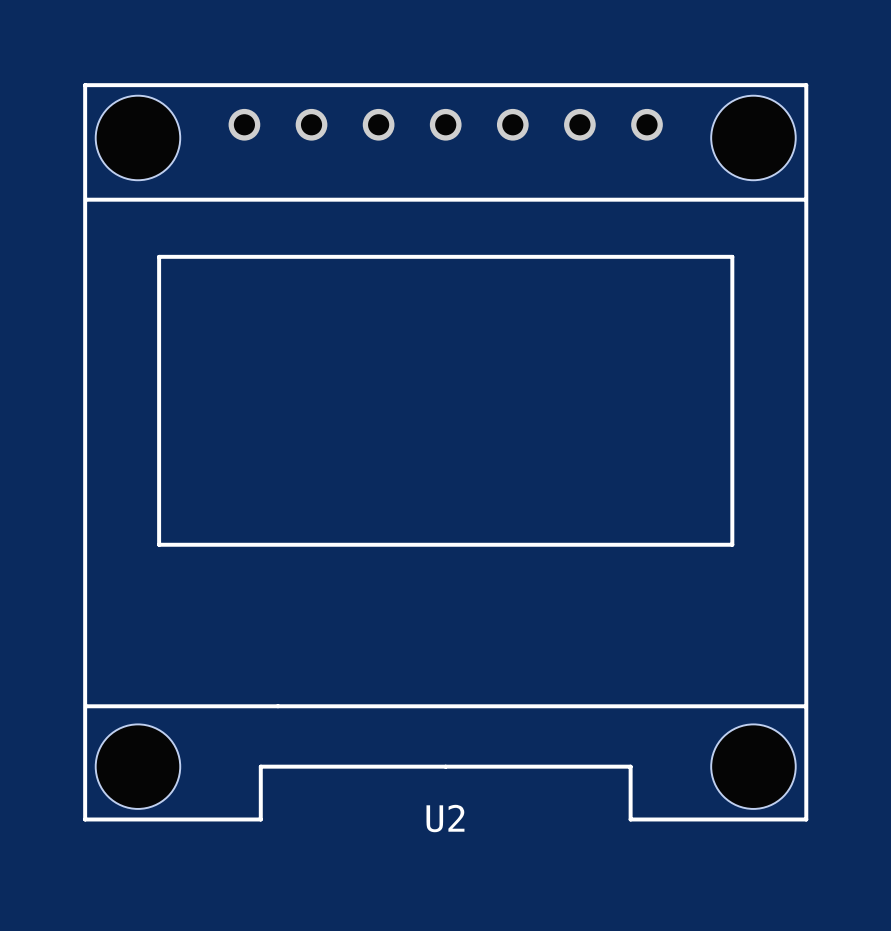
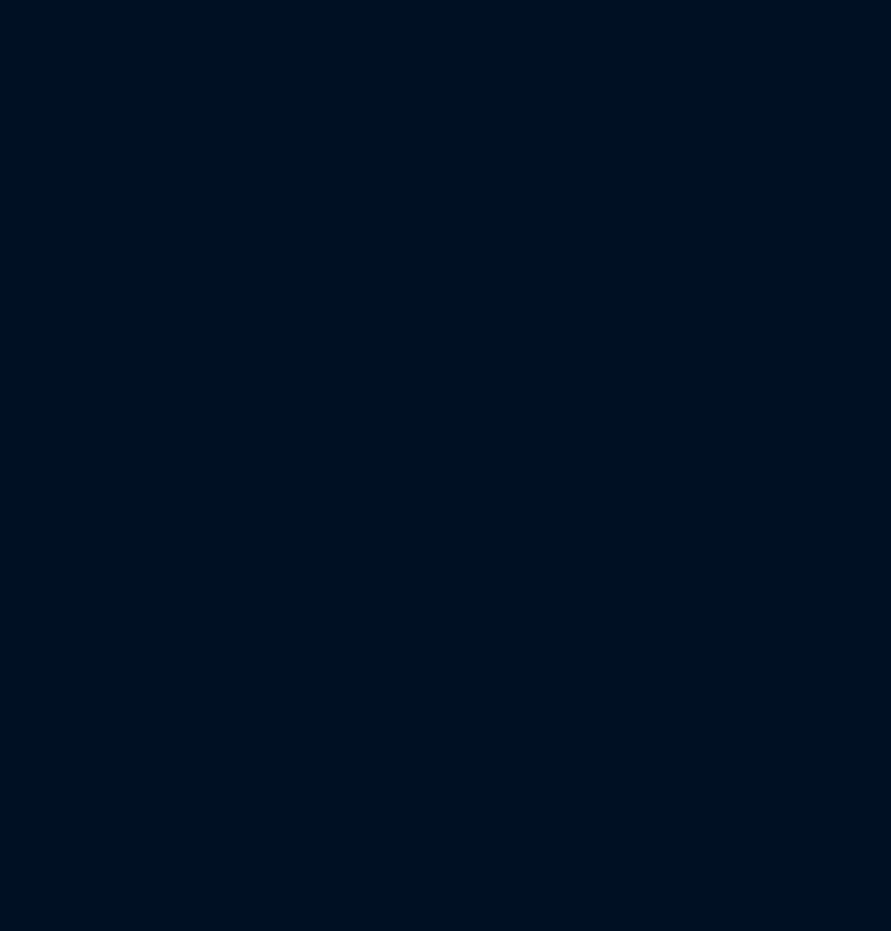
U2: (445, 452) -> none

